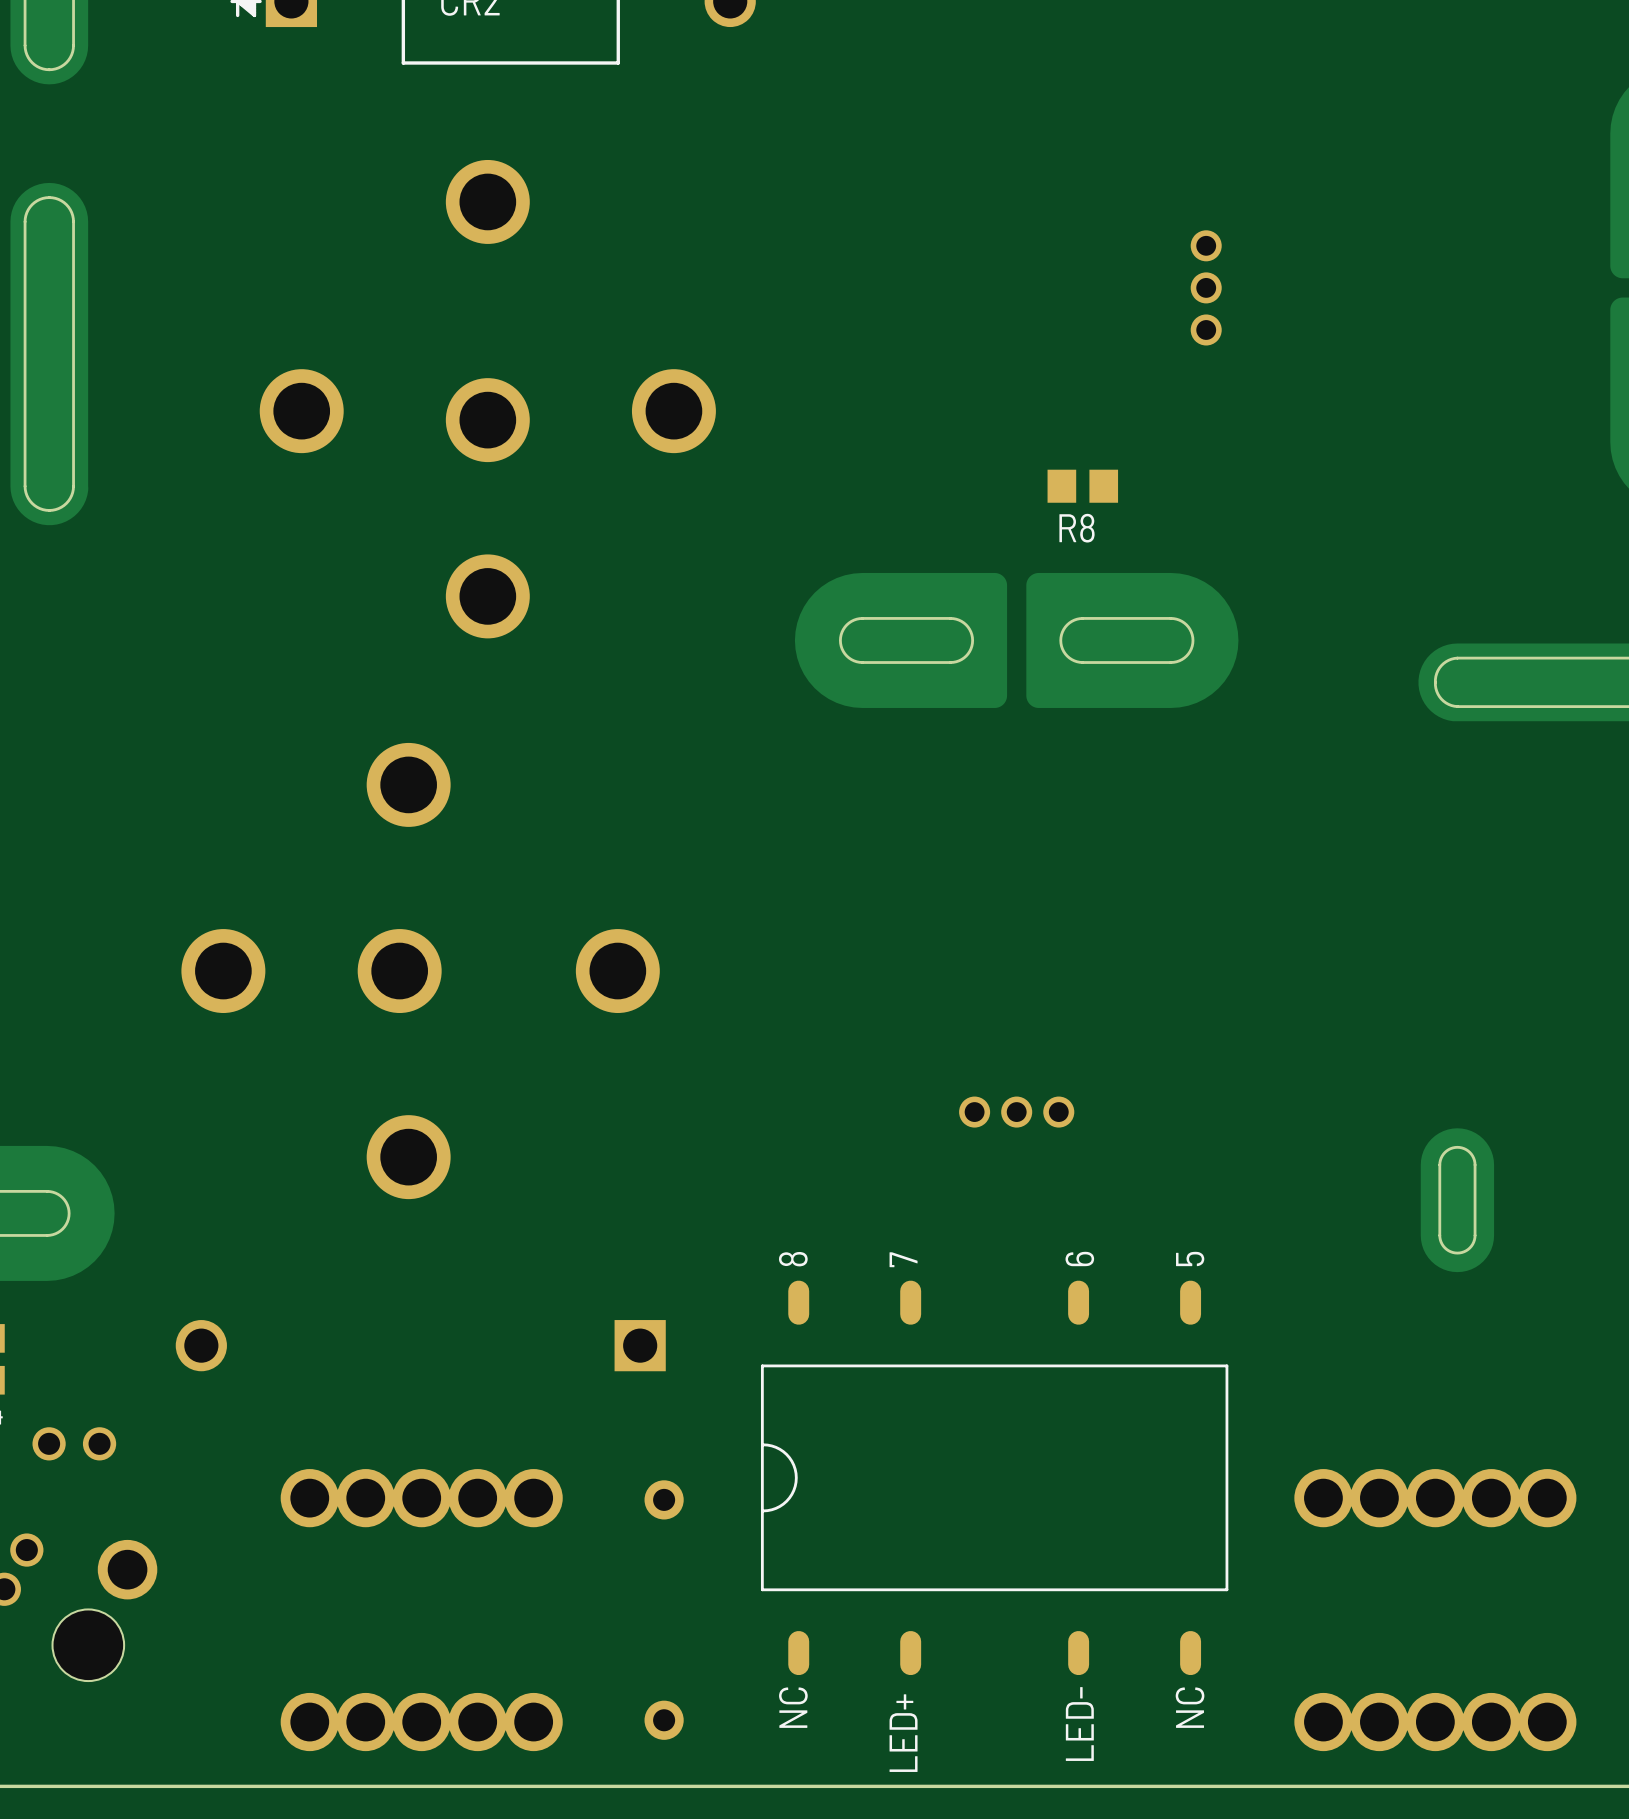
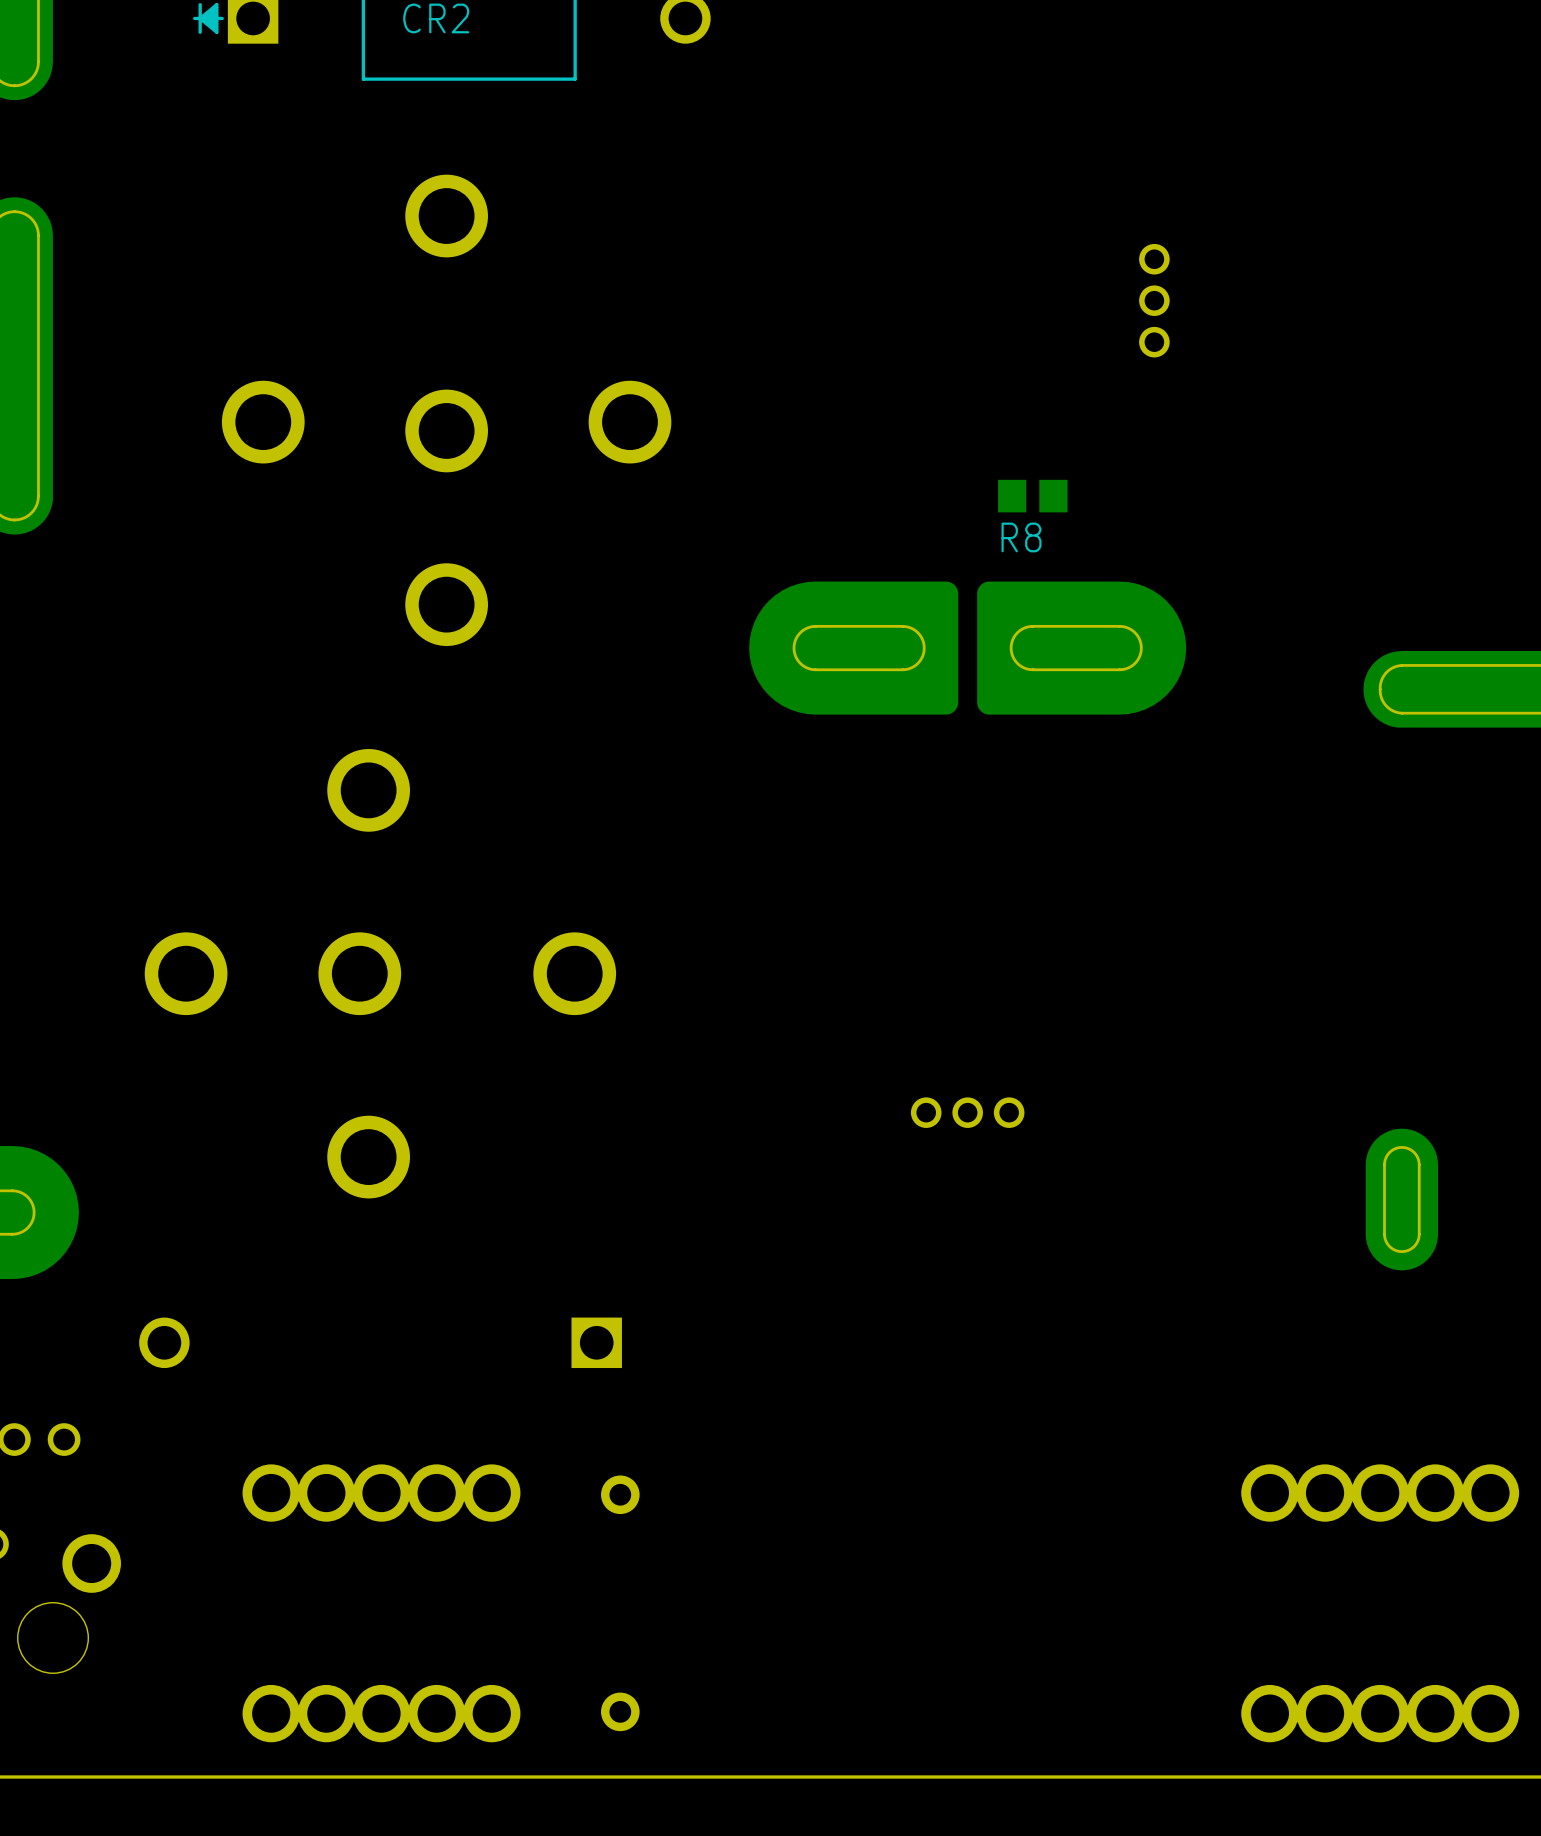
part: (994, 1477) -> none

